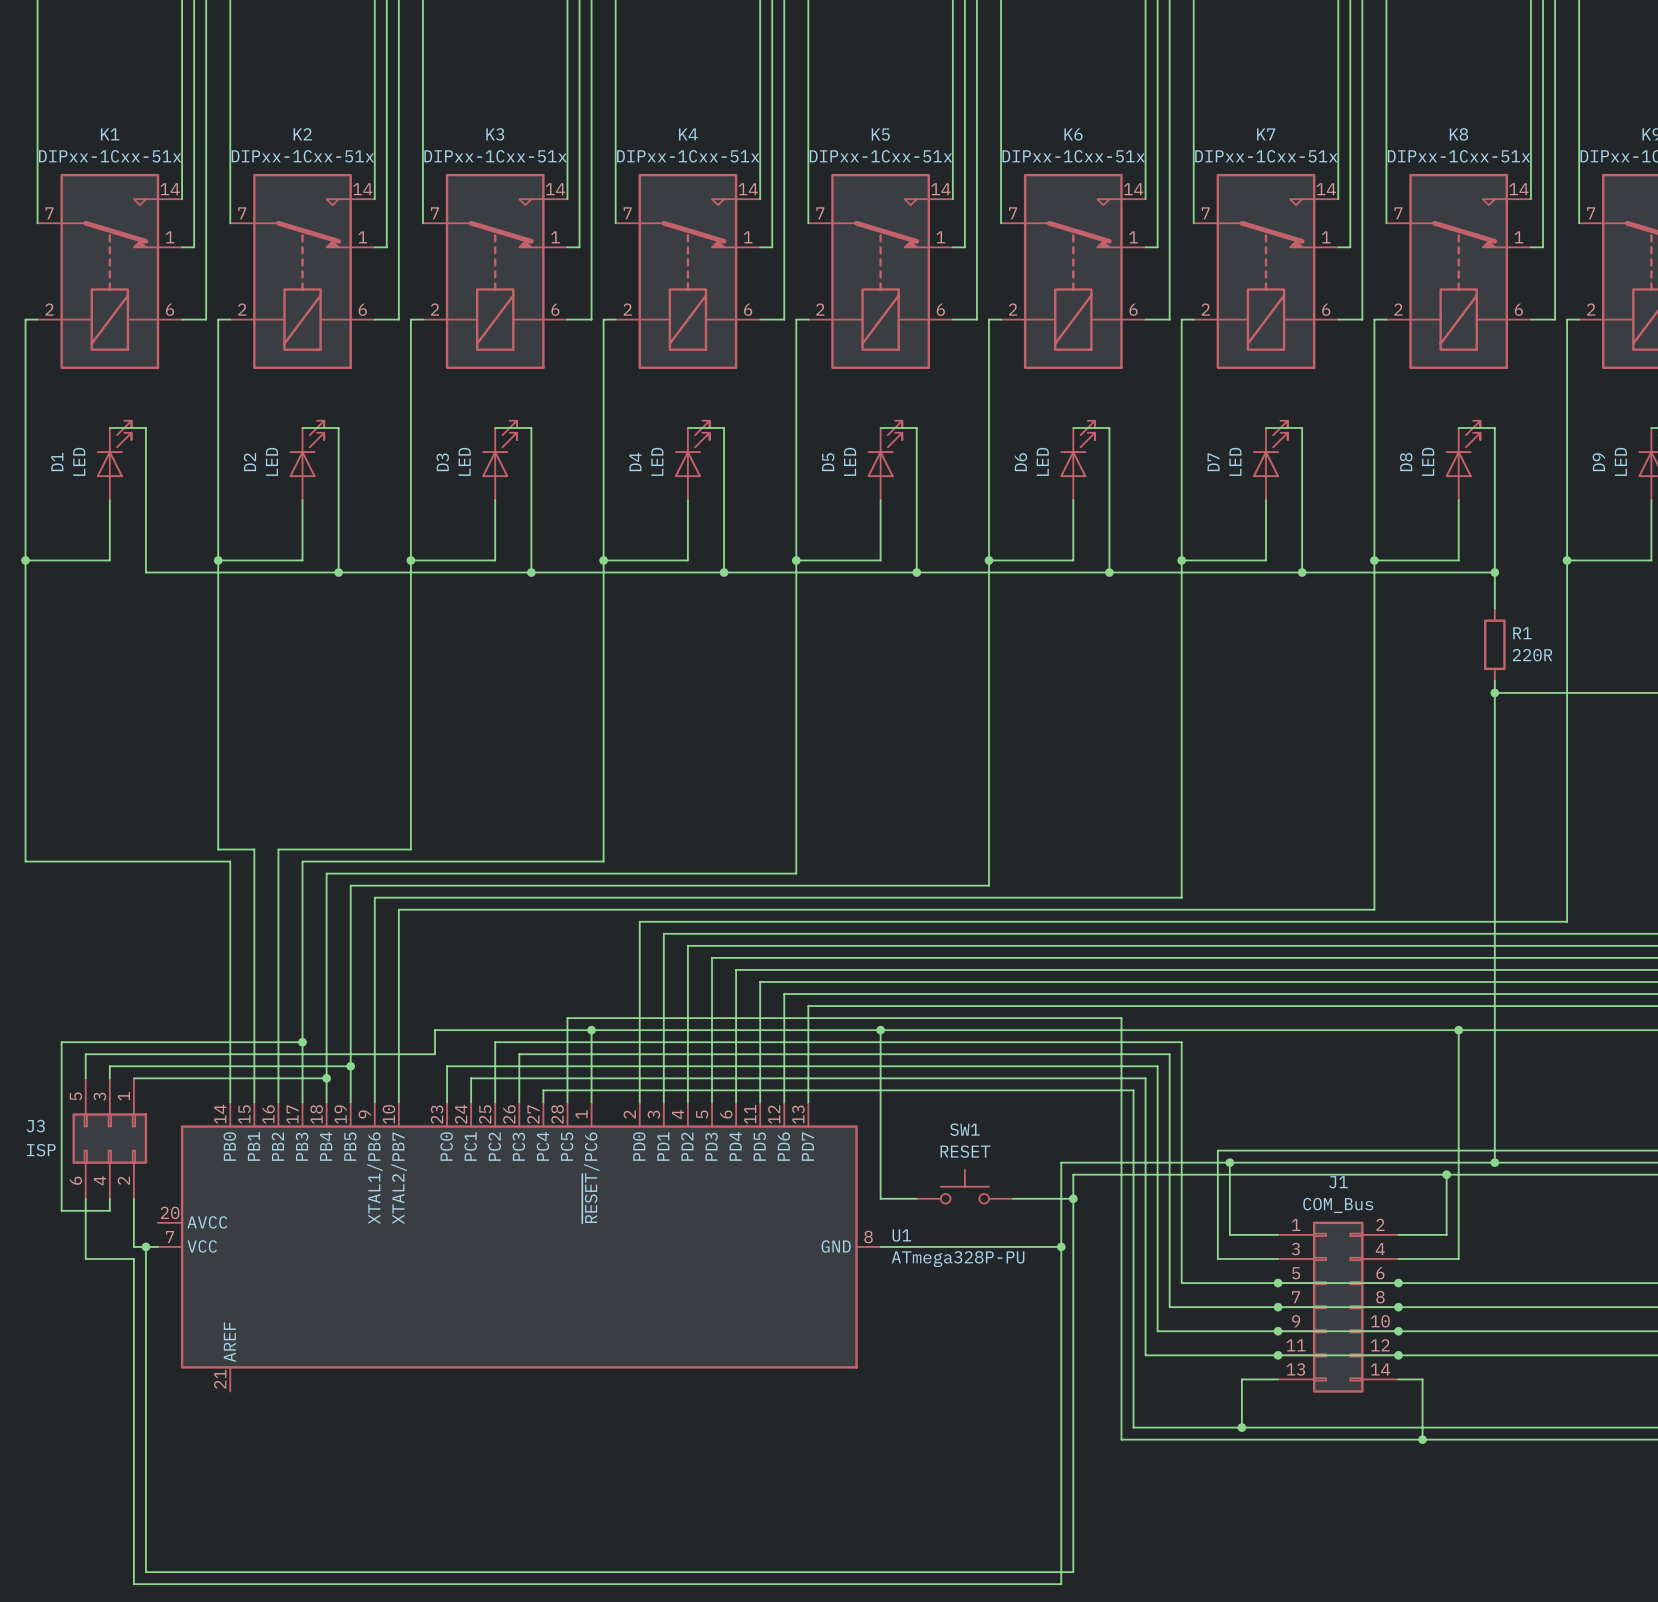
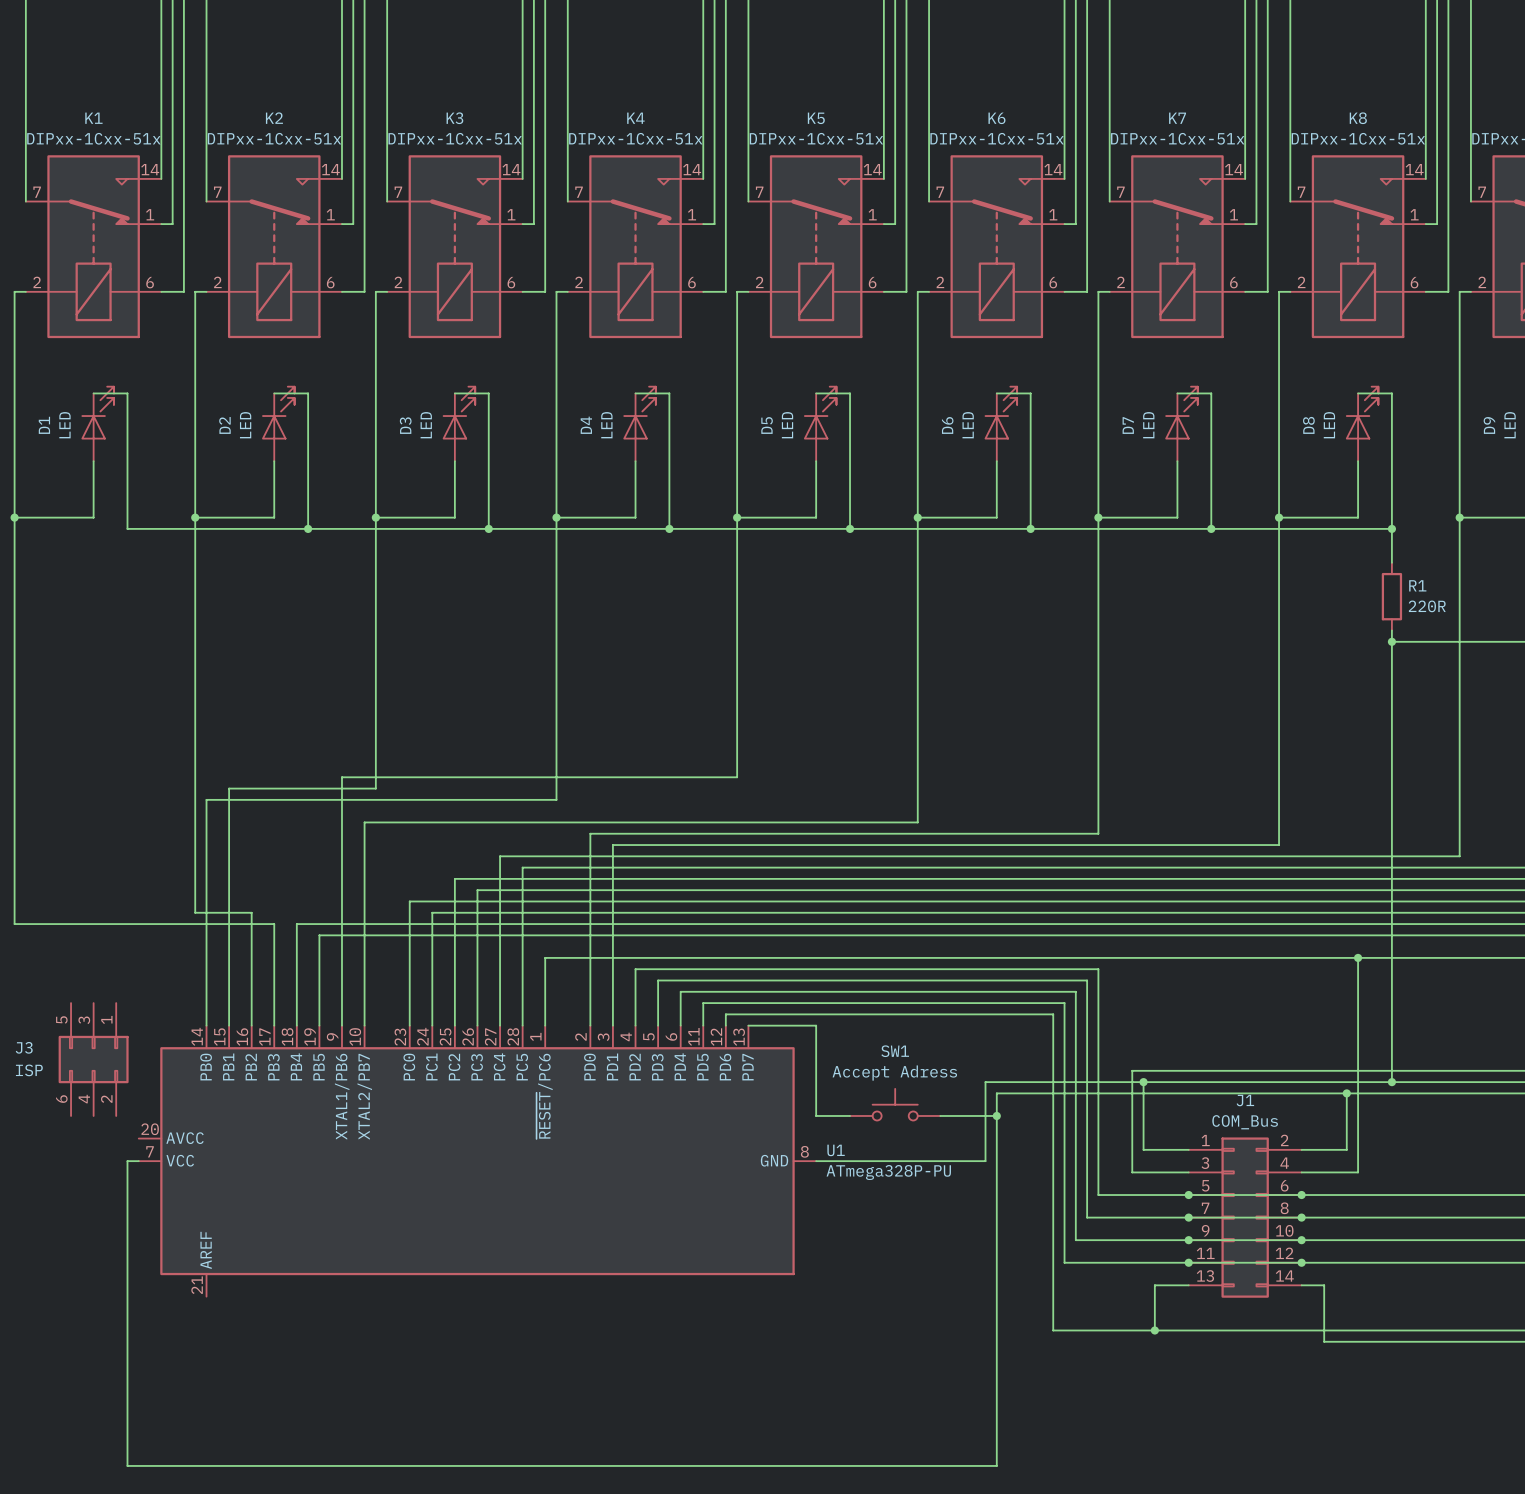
wire: (796, 837) (796, 873) (326, 873) (326, 994) -> (737, 777) (341, 777) (341, 833)
wire: (218, 849) (254, 849) -> (251, 788) (229, 788)
wire: (278, 849) (278, 981) -> (195, 788) (195, 912) (251, 912)
wire: (25, 861) (230, 861) -> (14, 799) (14, 924) (274, 924)
wire: (302, 861) (302, 994) -> (274, 799) (206, 799)
wire: (398, 885) (350, 885) (350, 1006) -> (364, 822) (364, 845)
wire: (374, 897) (639, 897) -> none
wire: (398, 909) (663, 909) -> (522, 946) (522, 867) (612, 867) (612, 845)
wire: (687, 945) (687, 1042) (495, 1042) -> (635, 878) (454, 878) (454, 969)
wire: (712, 957) (712, 1054) (519, 1054) -> (658, 890) (477, 890) (477, 980)
wire: (736, 969) (736, 1066) (447, 1066) -> (680, 901) (409, 901) (409, 991)
wire: (760, 981) (760, 1078) (471, 1078) -> (703, 912) (432, 912) (432, 1003)
wire: none -> (296, 924) (725, 924)
wire: (784, 994) (784, 1090) (543, 1090) -> (590, 833) (590, 856) (500, 856) (500, 1014)
wire: (808, 1006) (808, 1102) -> (748, 935) (319, 935)
wire: (567, 1018) (1121, 1018) (1121, 1439) (1422, 1439) -> none
wire: (591, 1030) (435, 1030) (435, 1054) (85, 1054) (85, 1078) -> none
junction: (591, 1030) -> none
wire: (880, 1030) (880, 1102) -> (748, 1025) (816, 1025)
junction: (880, 1030) -> none
wire: (302, 1042) (61, 1042) (61, 1210) (109, 1210) (109, 1198) -> none
junction: (302, 1042) -> none
wire: (350, 1066) (109, 1066) (109, 1078) -> none
junction: (350, 1066) -> none
wire: (133, 1078) (326, 1078) -> none
junction: (326, 1078) -> none
SW1 value: RESET (965, 1151) -> Accept Adress (894, 1073)
wire: (85, 1198) (85, 1258) (133, 1258) (133, 1584) (1061, 1584) (1061, 1246) -> none
wire: (133, 1198) (133, 1246) (145, 1246) -> none
junction: (145, 1246) -> none
junction: (1061, 1246) -> none
junction: (1422, 1439) -> none

